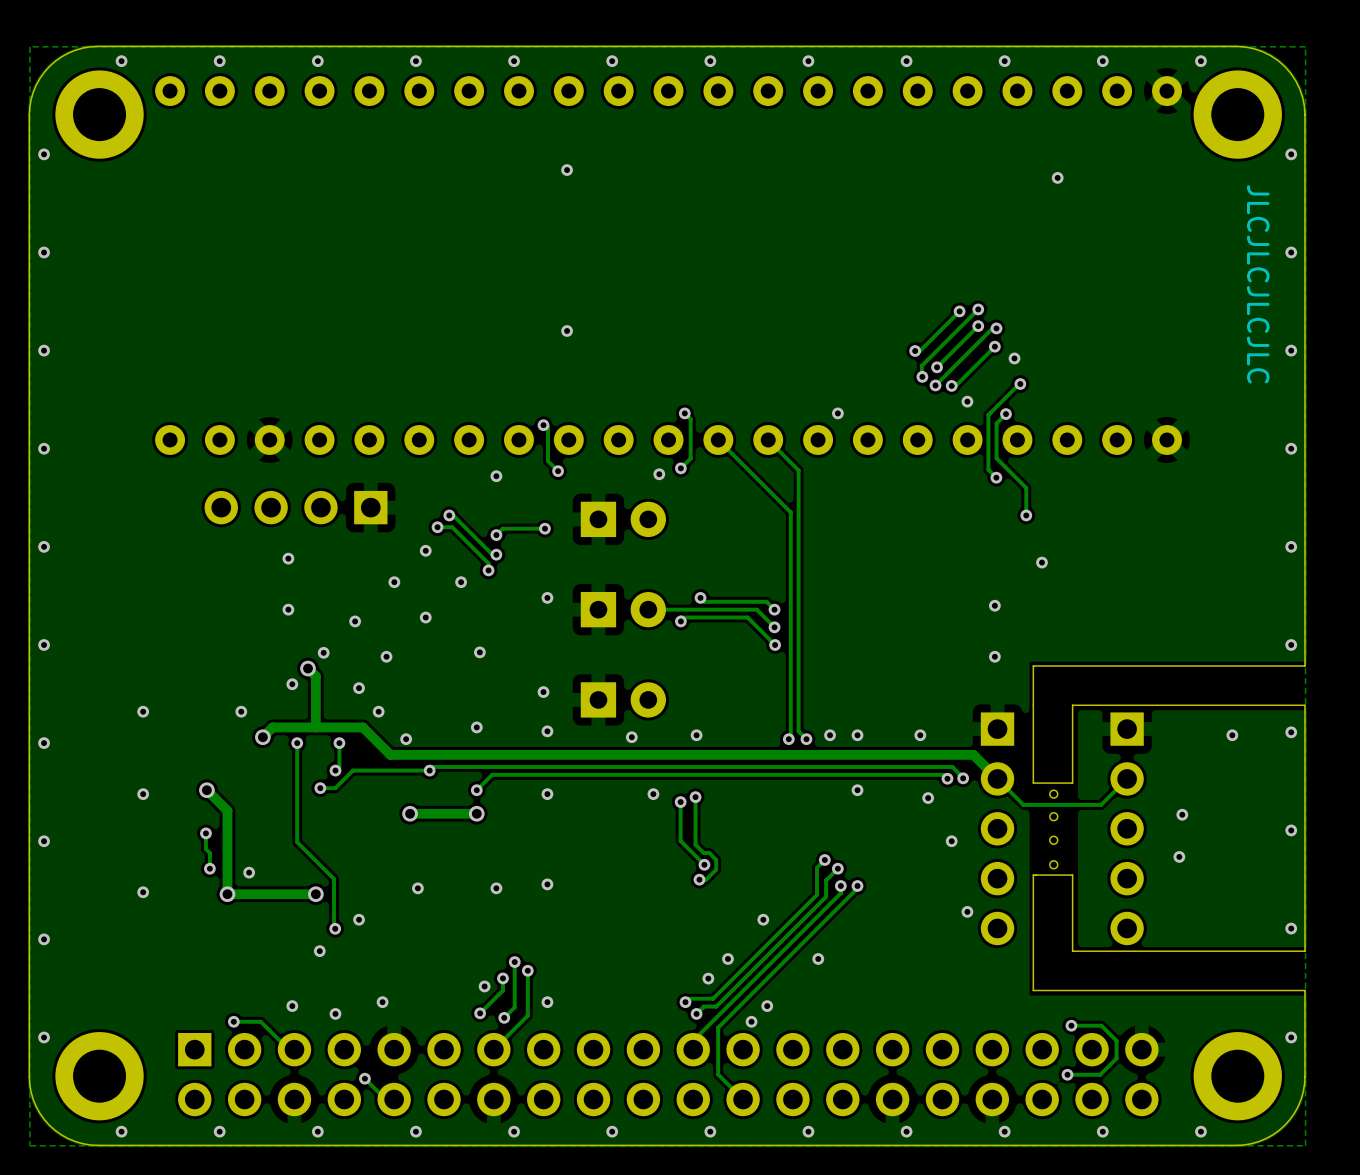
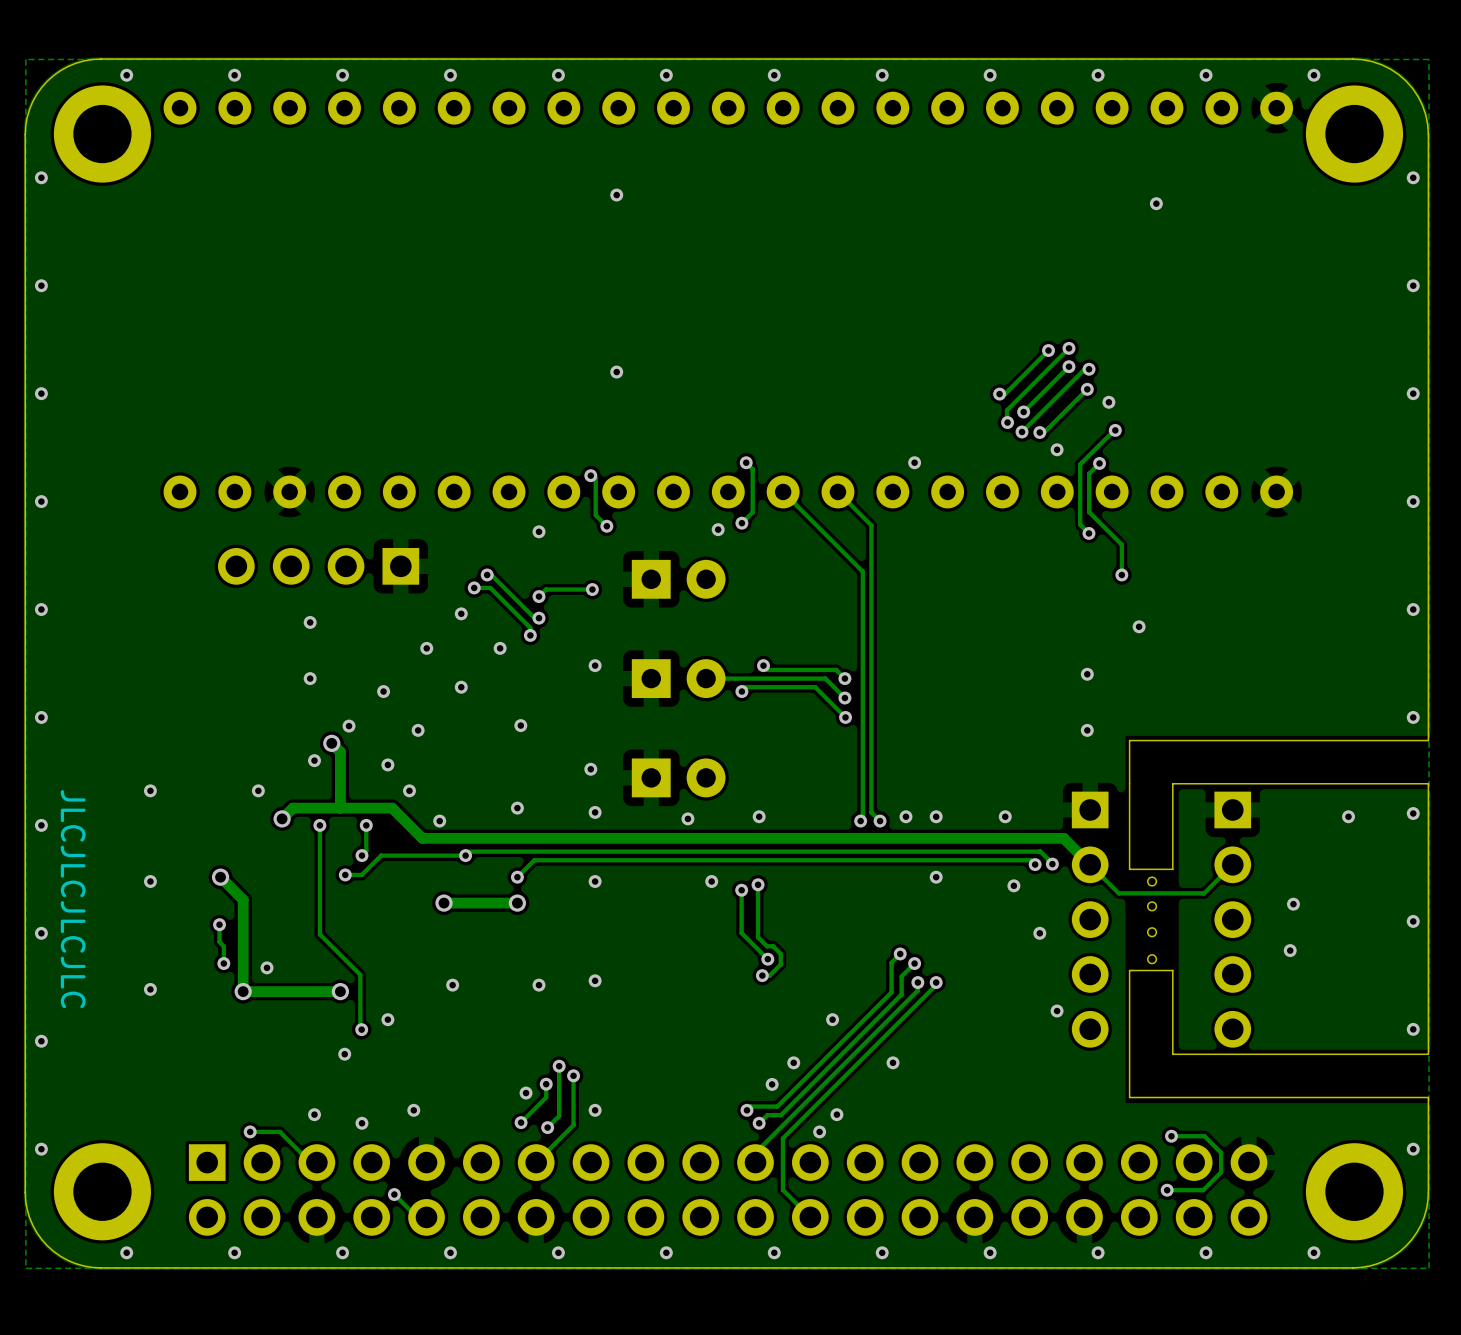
text: JLCJLCJLCJLC (1258, 284) -> none
text: none -> JLCJLCJLCJLC (73, 899)

